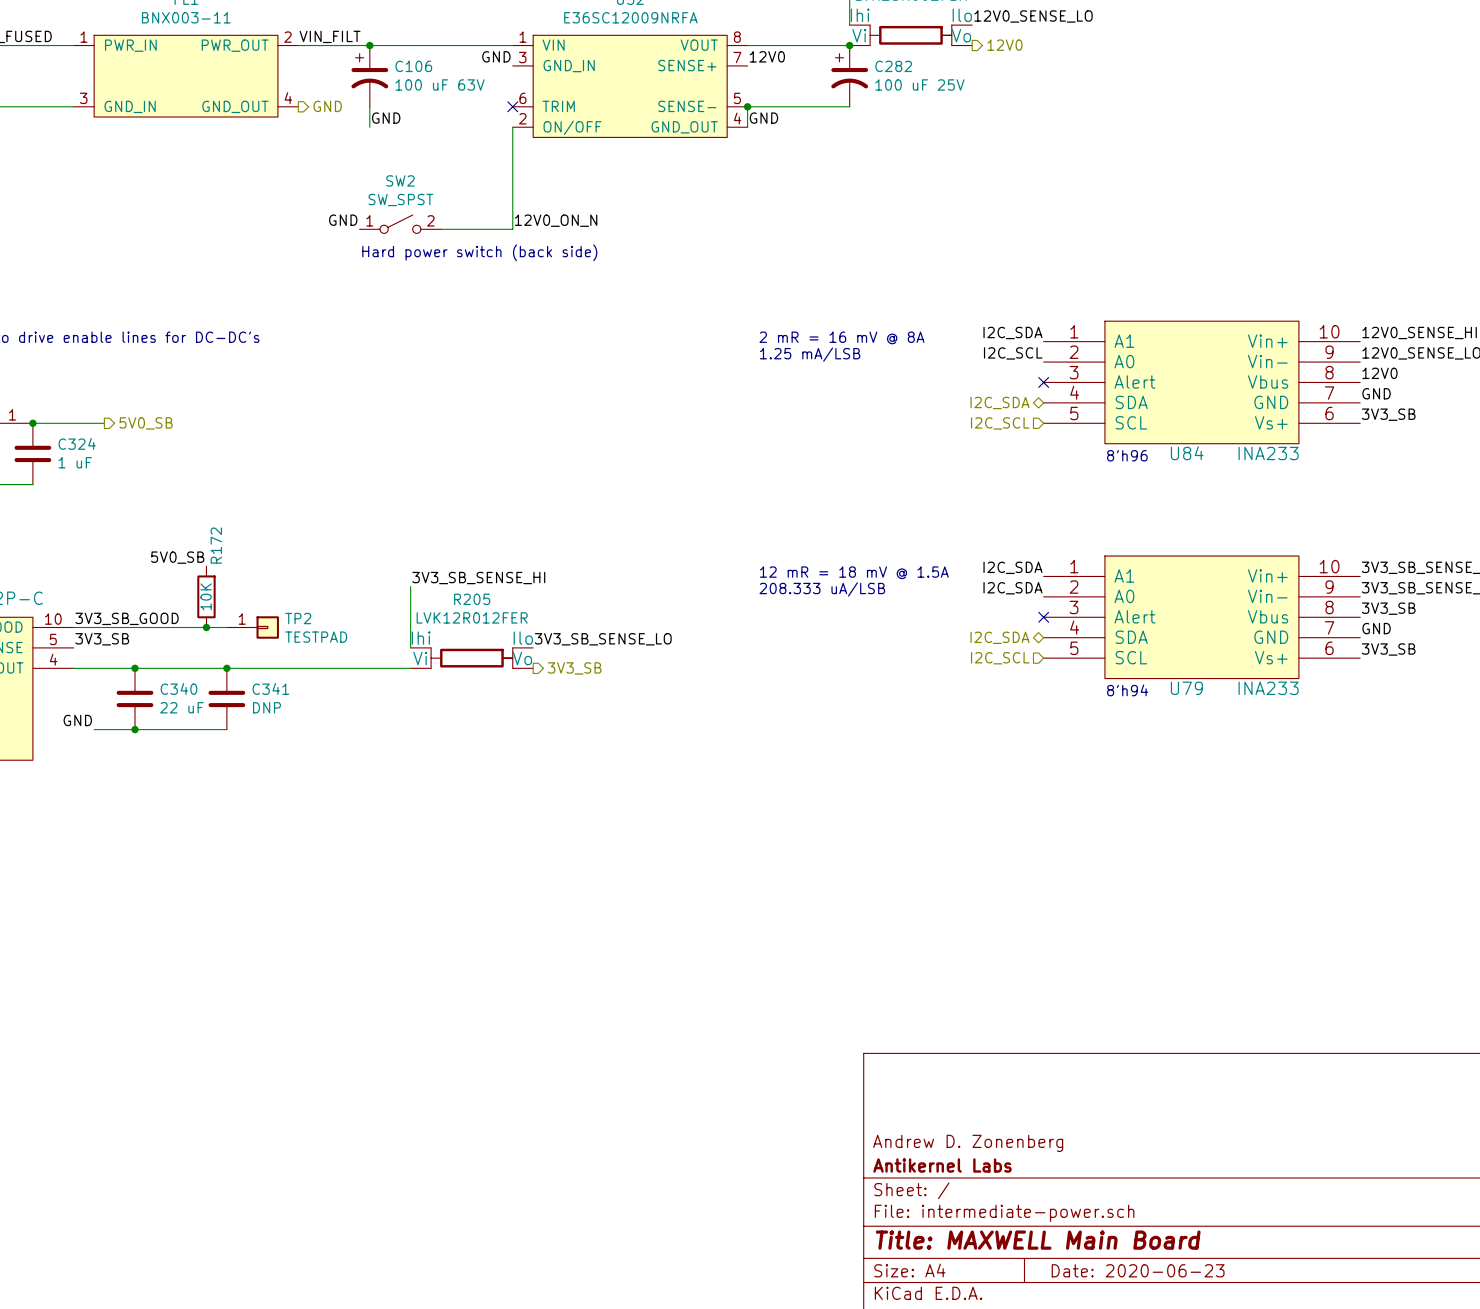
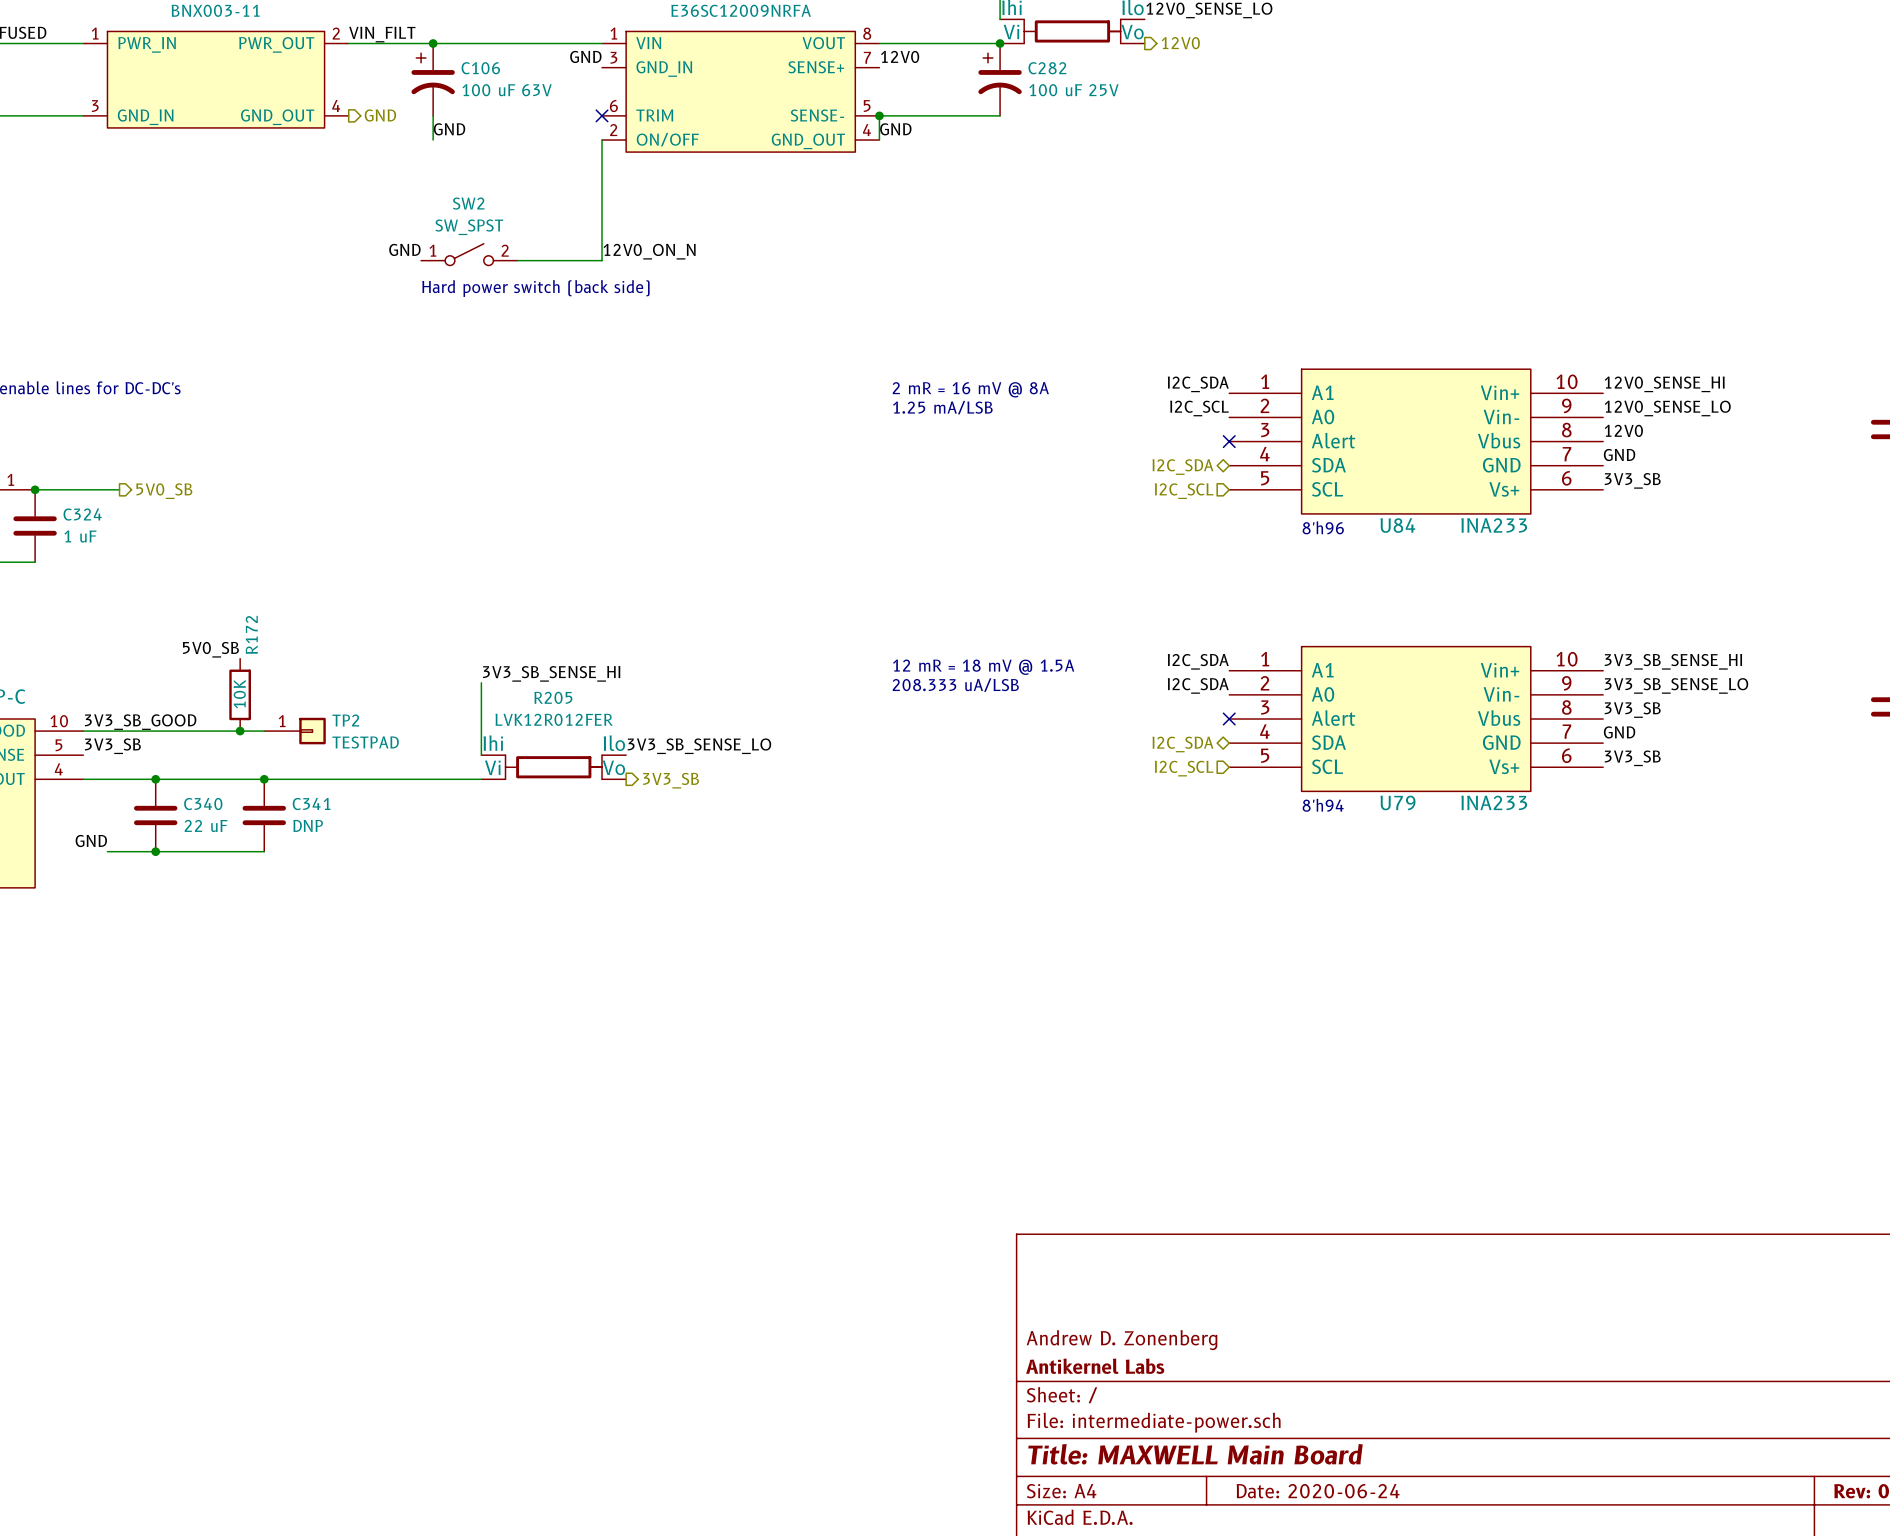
title block: Date: 2020-06-23 (1138, 1270) -> Date: 2020-06-24 (1318, 1491)

